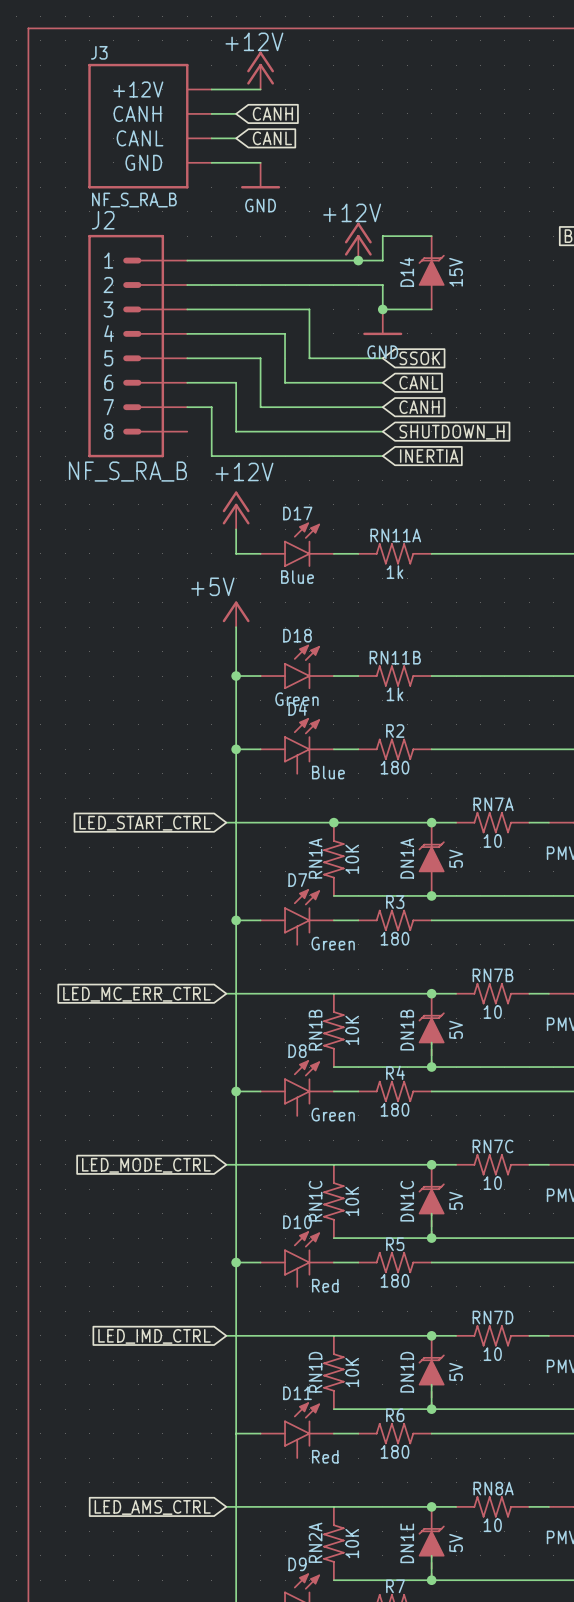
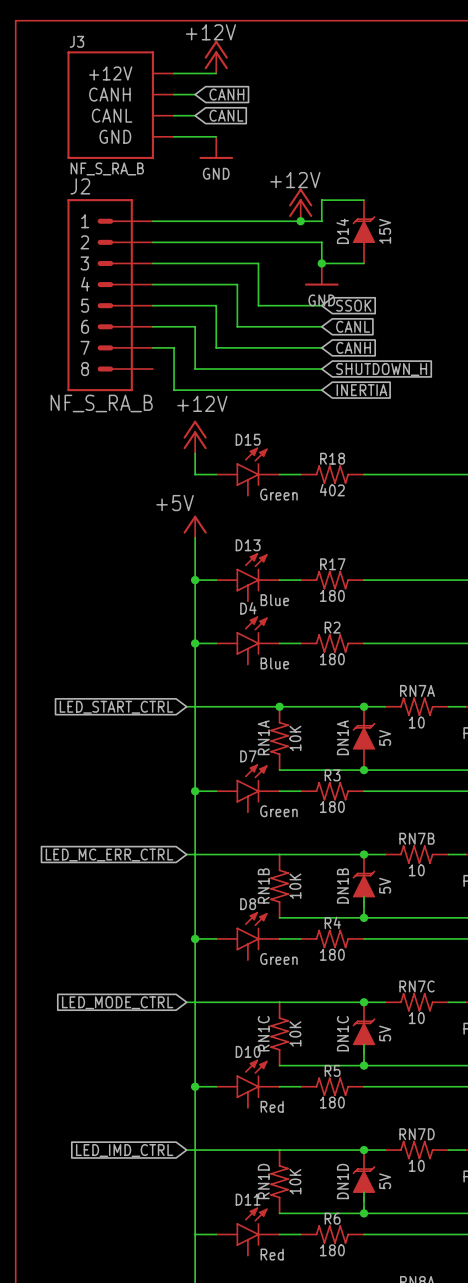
RN11A name: RN11A (395, 535) -> R18 (332, 458)
D17: (297, 544) -> none
D15: none -> (247, 471)
RN11A text: 1k (394, 572) -> 402 (332, 490)
RN11B name: RN11B (395, 657) -> R17 (332, 564)
D18: (297, 666) -> none
D13: none -> (247, 577)
RN11B text: 1k (394, 694) -> 180 (332, 595)

